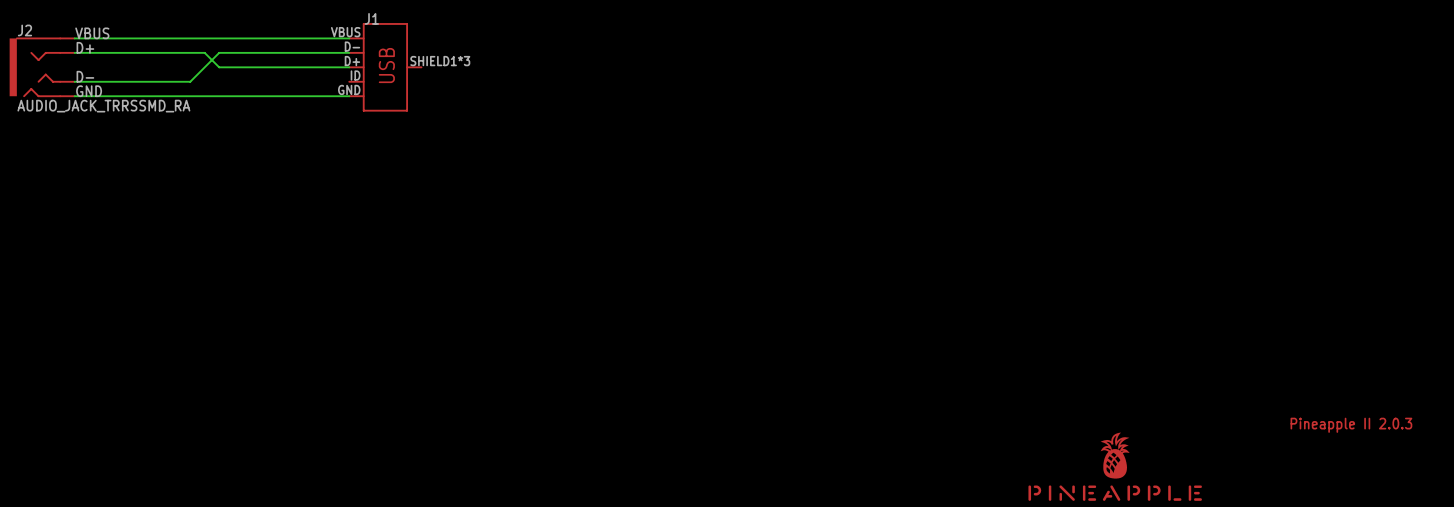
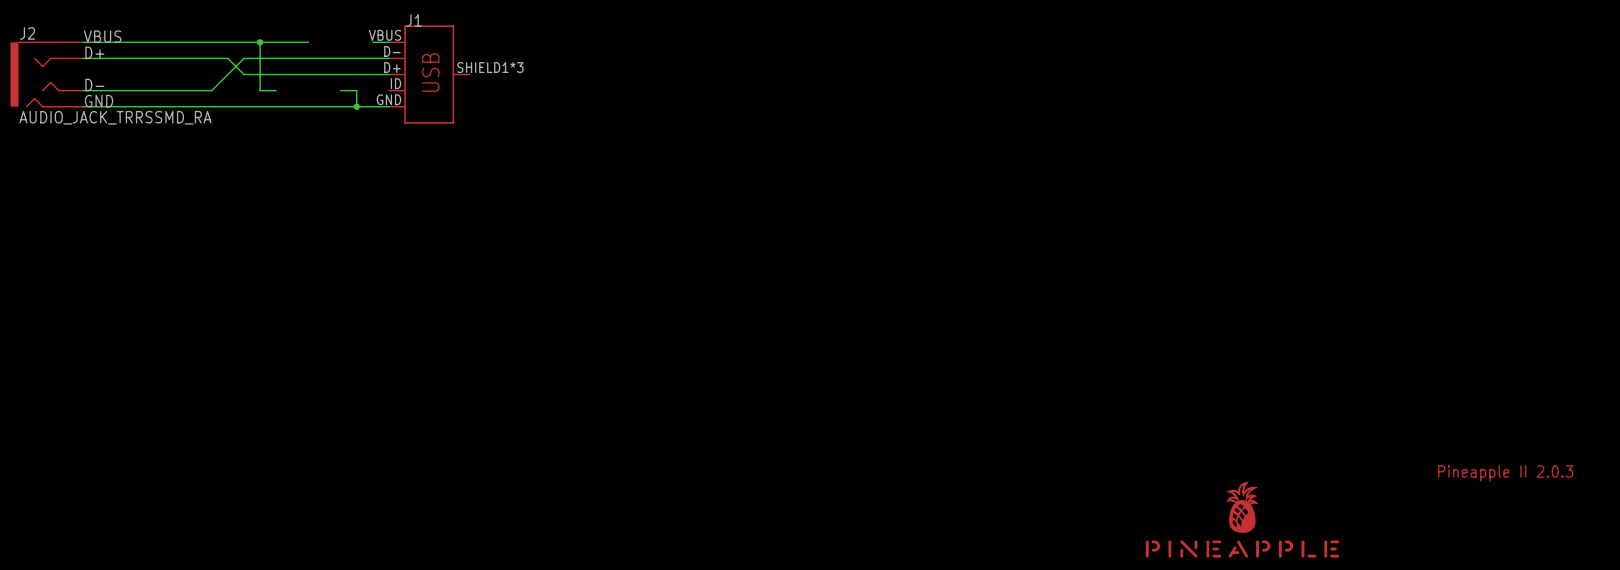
wire: none -> (260, 42) (260, 90) (276, 90)
junction: none -> (260, 42)
wire: (277, 38) (334, 38) -> none
wire: none -> (340, 90) (356, 90) (356, 106)
junction: none -> (356, 106)

